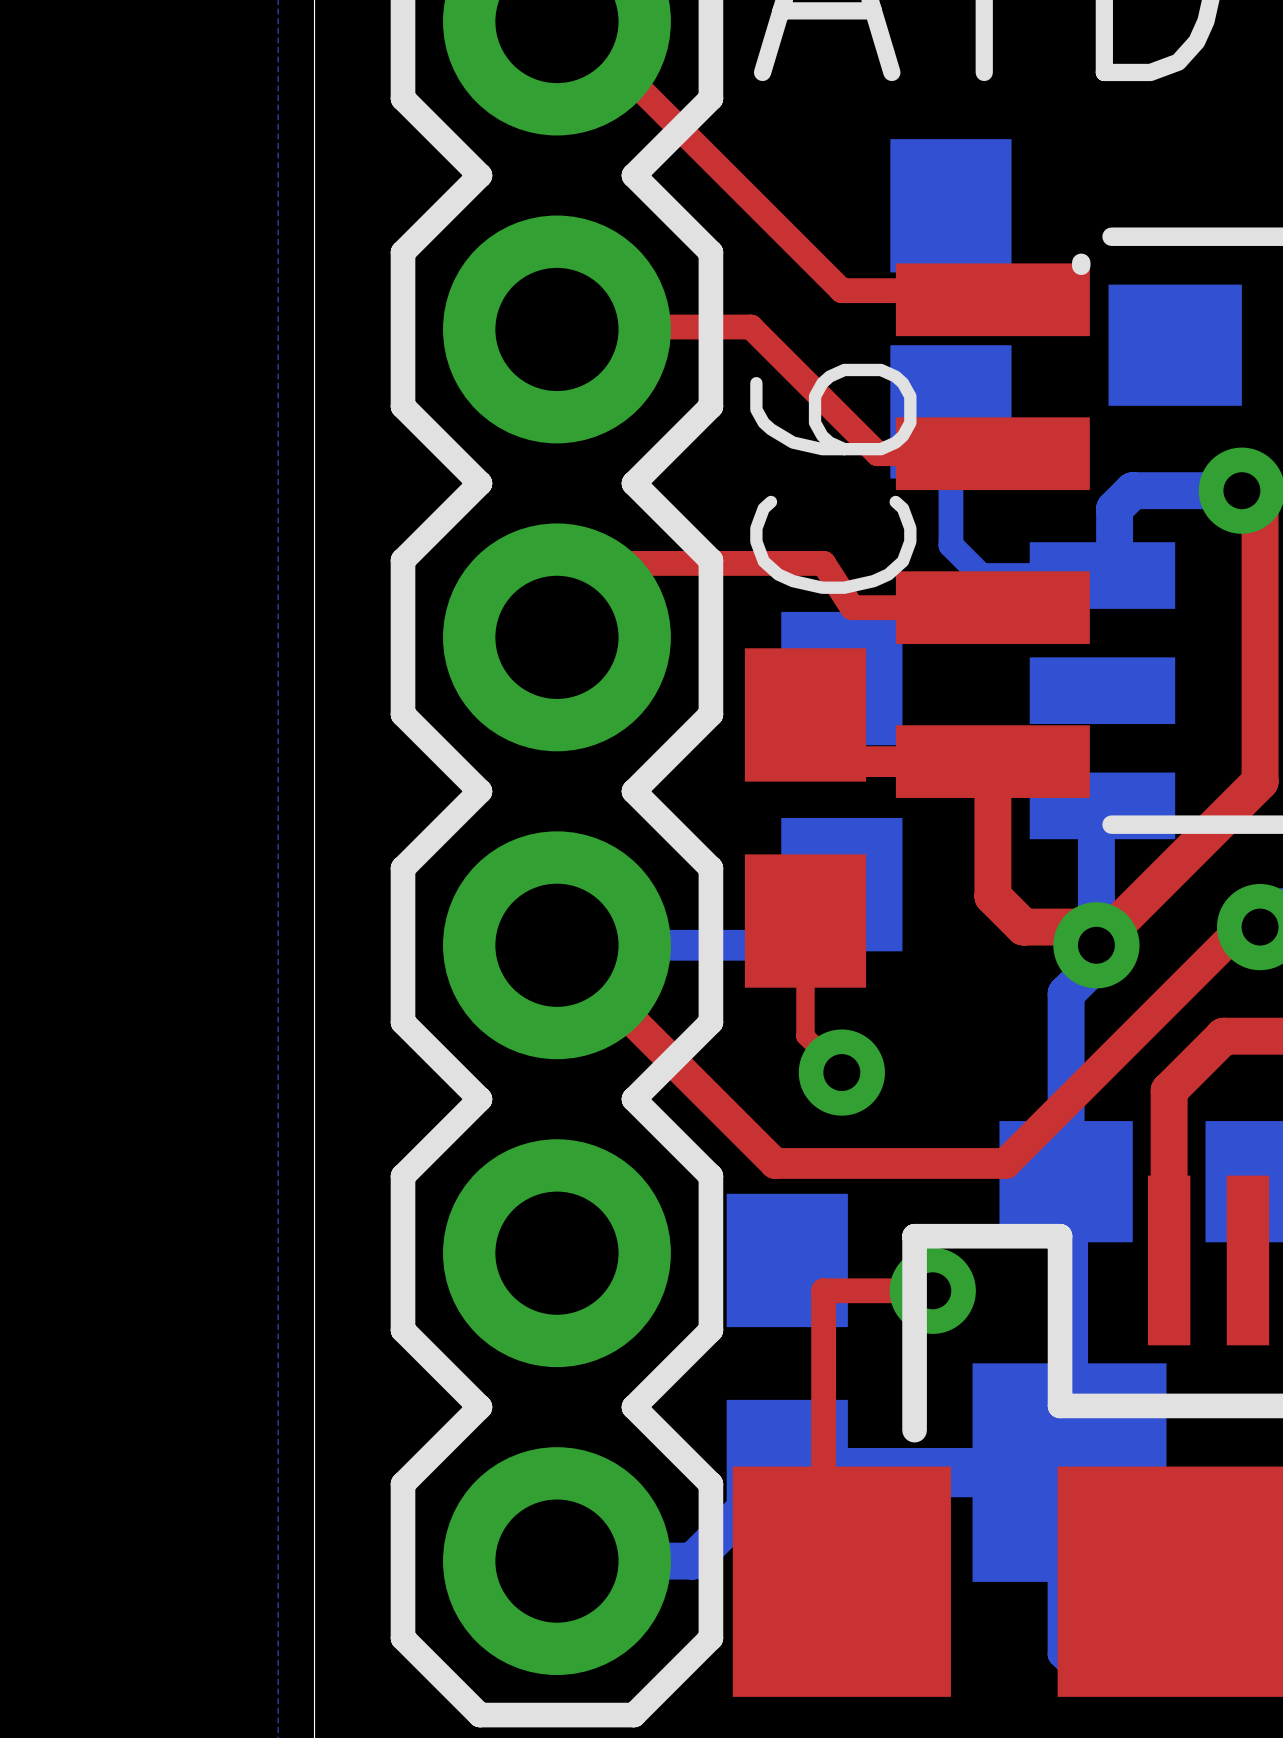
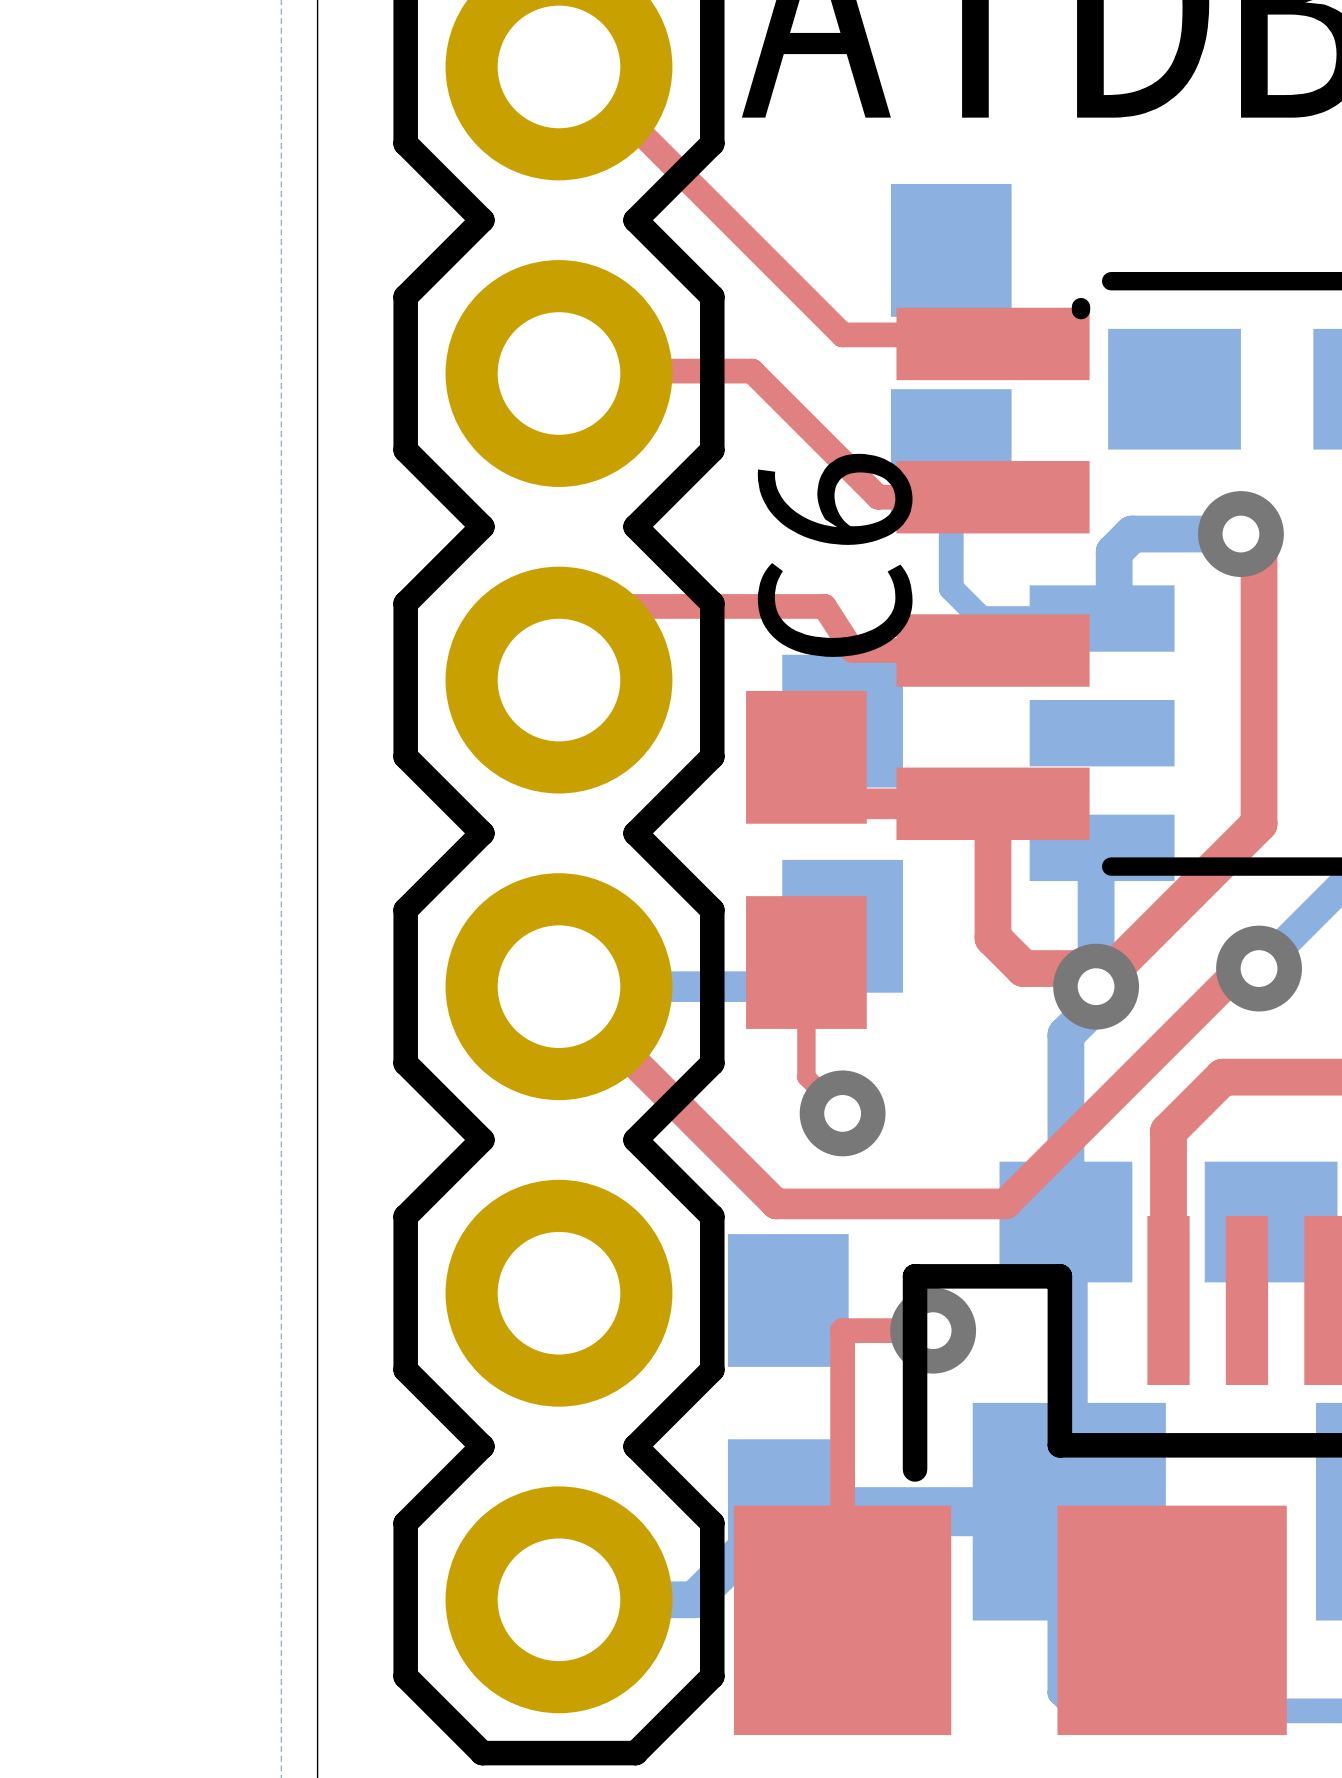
top track: (841, 1290) (823, 1290) (823, 1575) (841, 1581) -> (842, 1330) (842, 1620)

